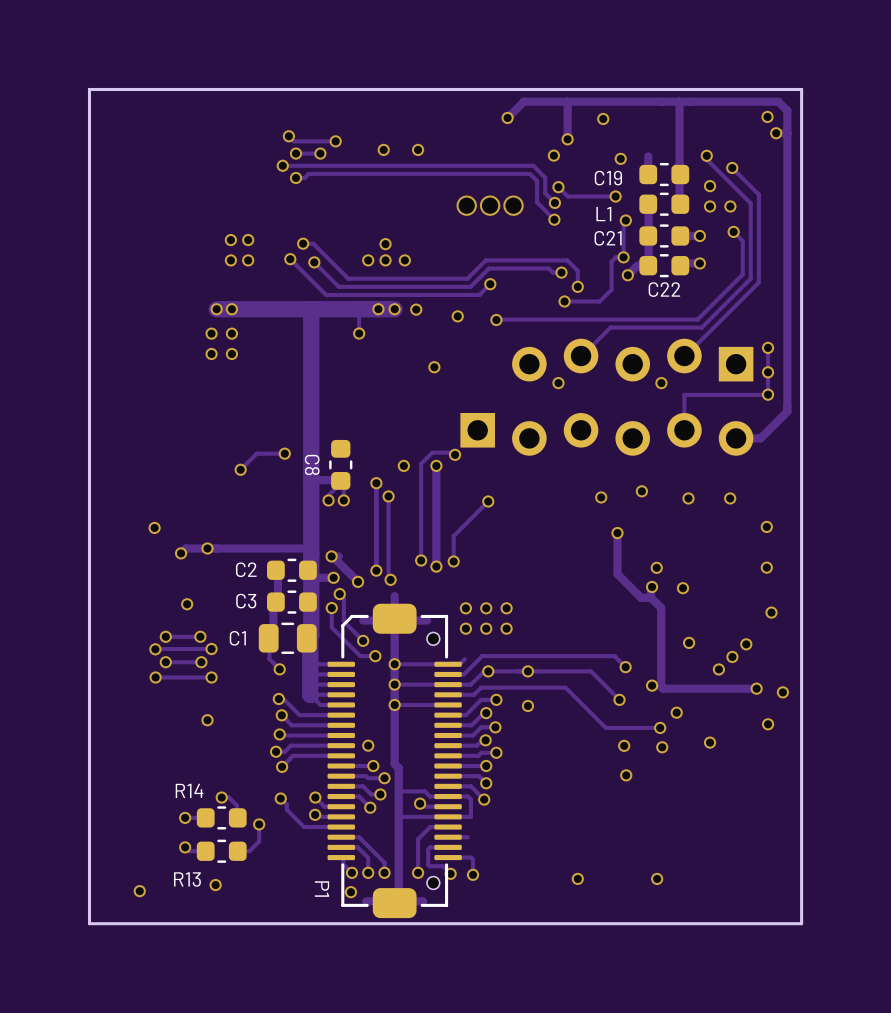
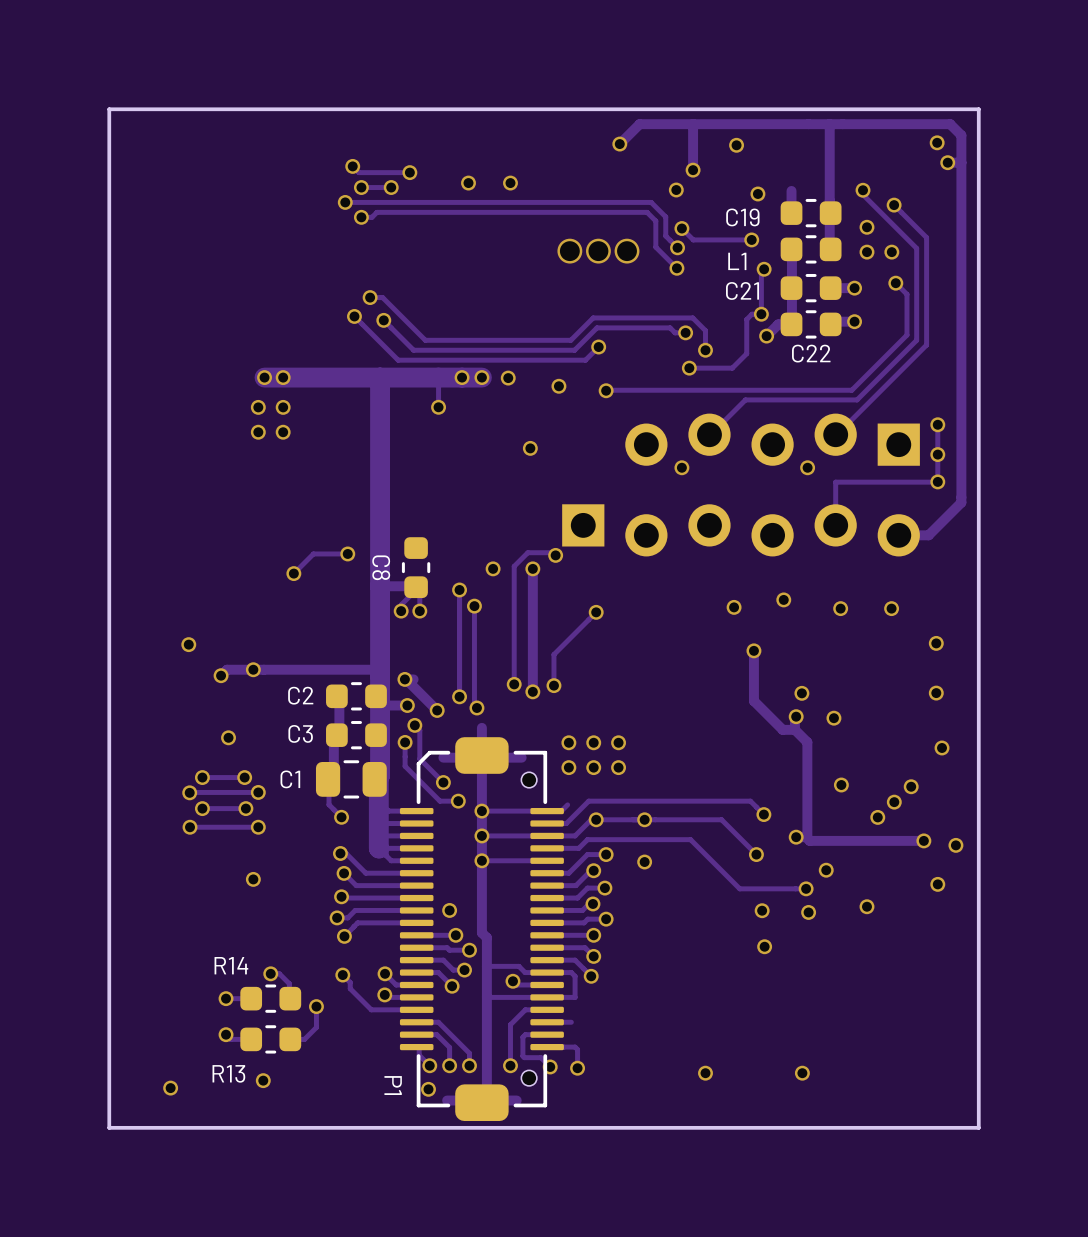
via: (230, 240) -> none
via: (248, 240) -> none
via: (385, 244) -> none
via: (230, 260) -> none
via: (248, 260) -> none
via: (368, 260) -> none
via: (385, 260) -> none
via: (404, 260) -> none

